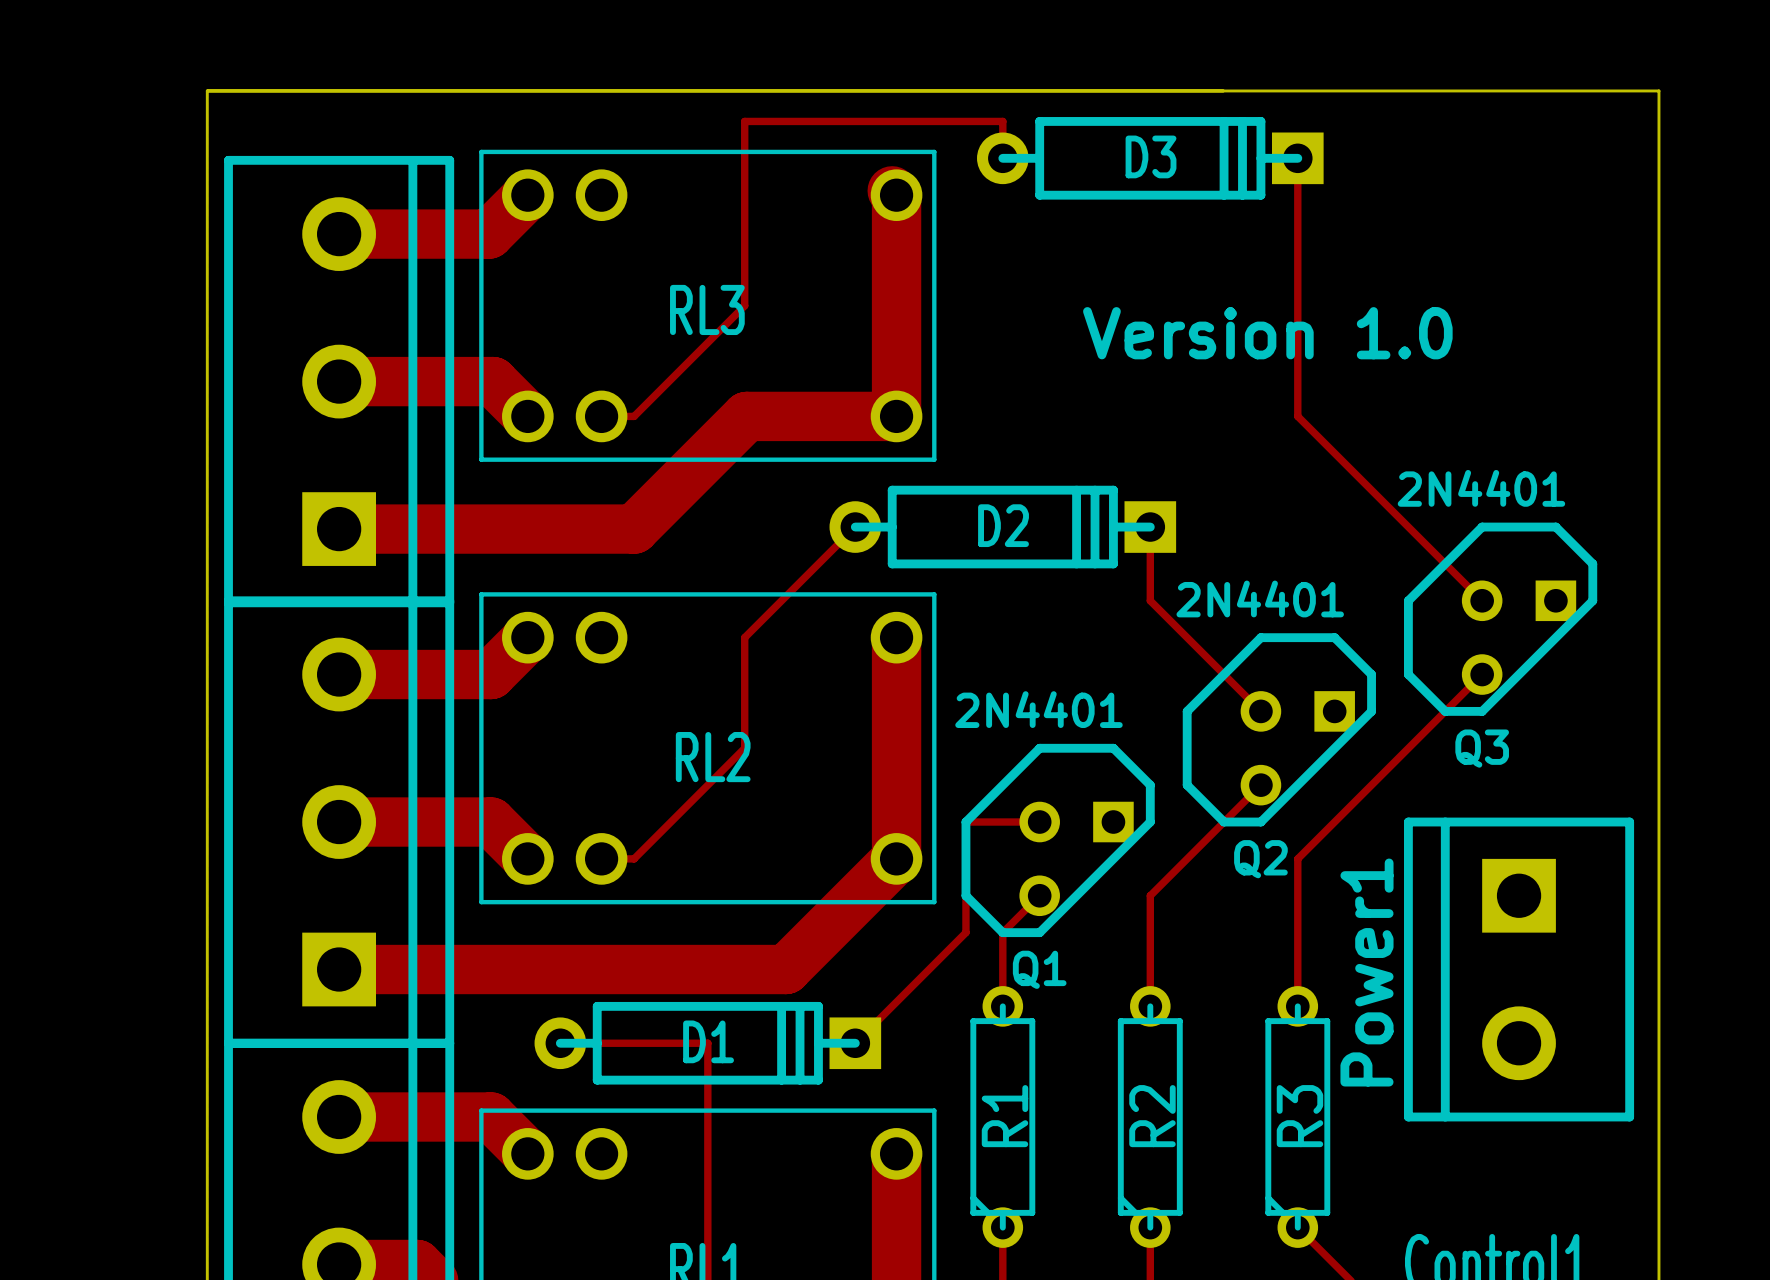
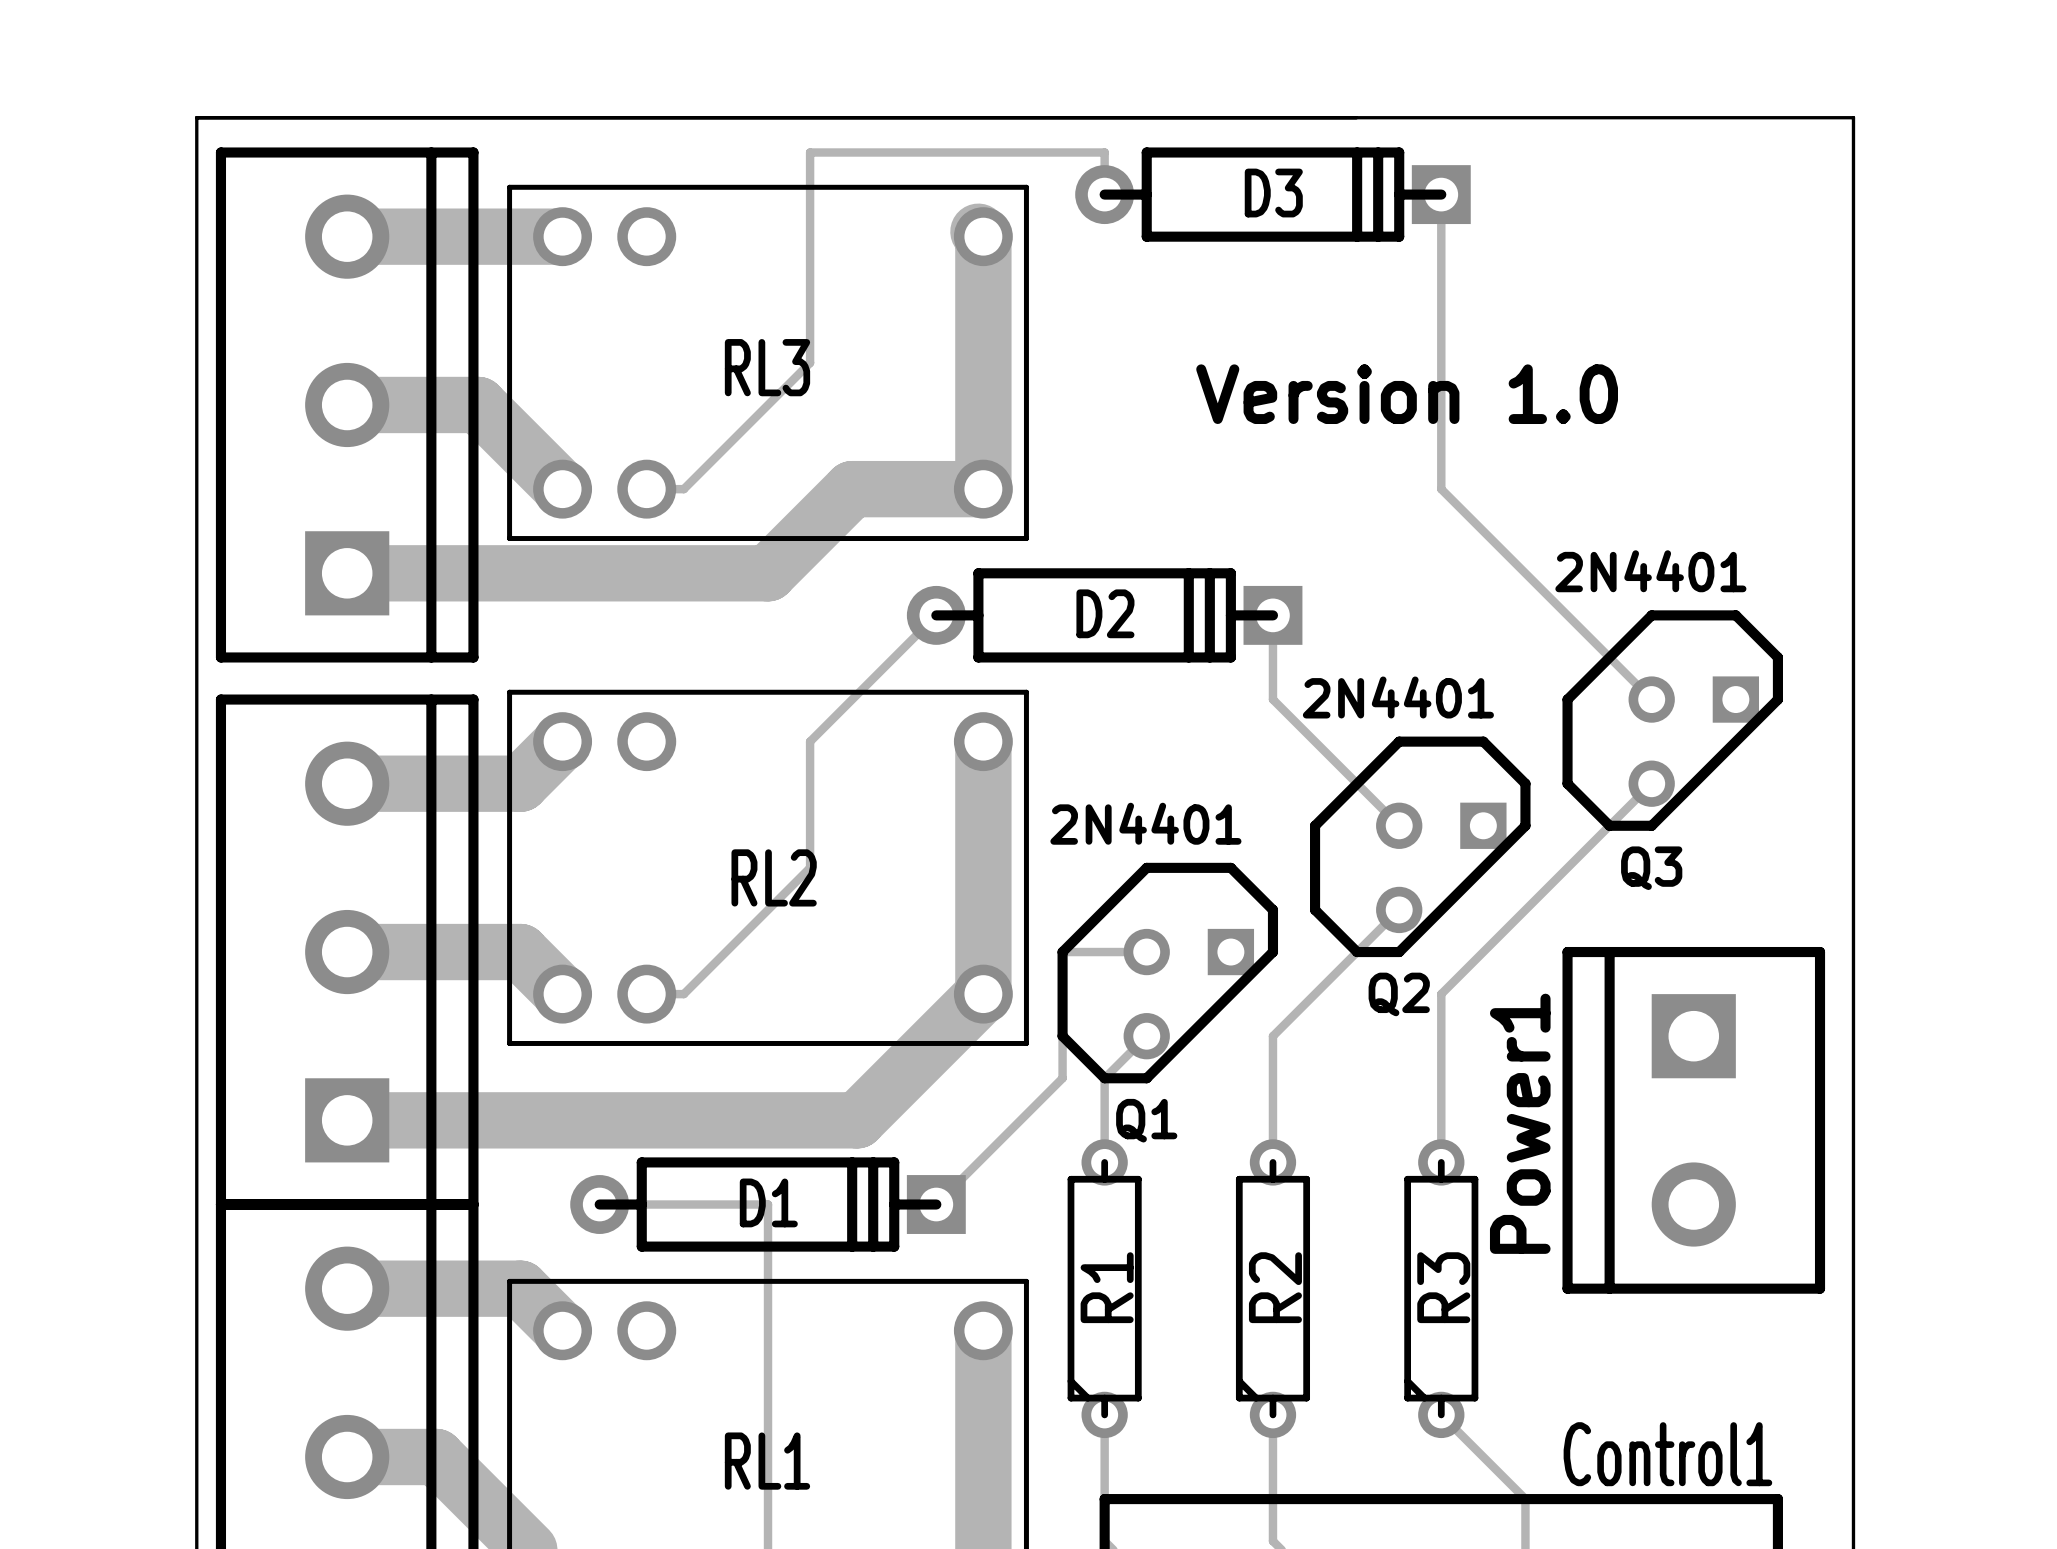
track: (527, 195) (488, 234) (339, 234) -> (562, 236) (347, 236)
track: (339, 381) (492, 381) -> (347, 404) (478, 404) (522, 449)
part position: (339, 381) -> (347, 404)
track: (781, 416) (746, 416) (634, 529) (339, 529) -> (852, 489) (768, 573) (347, 573)

